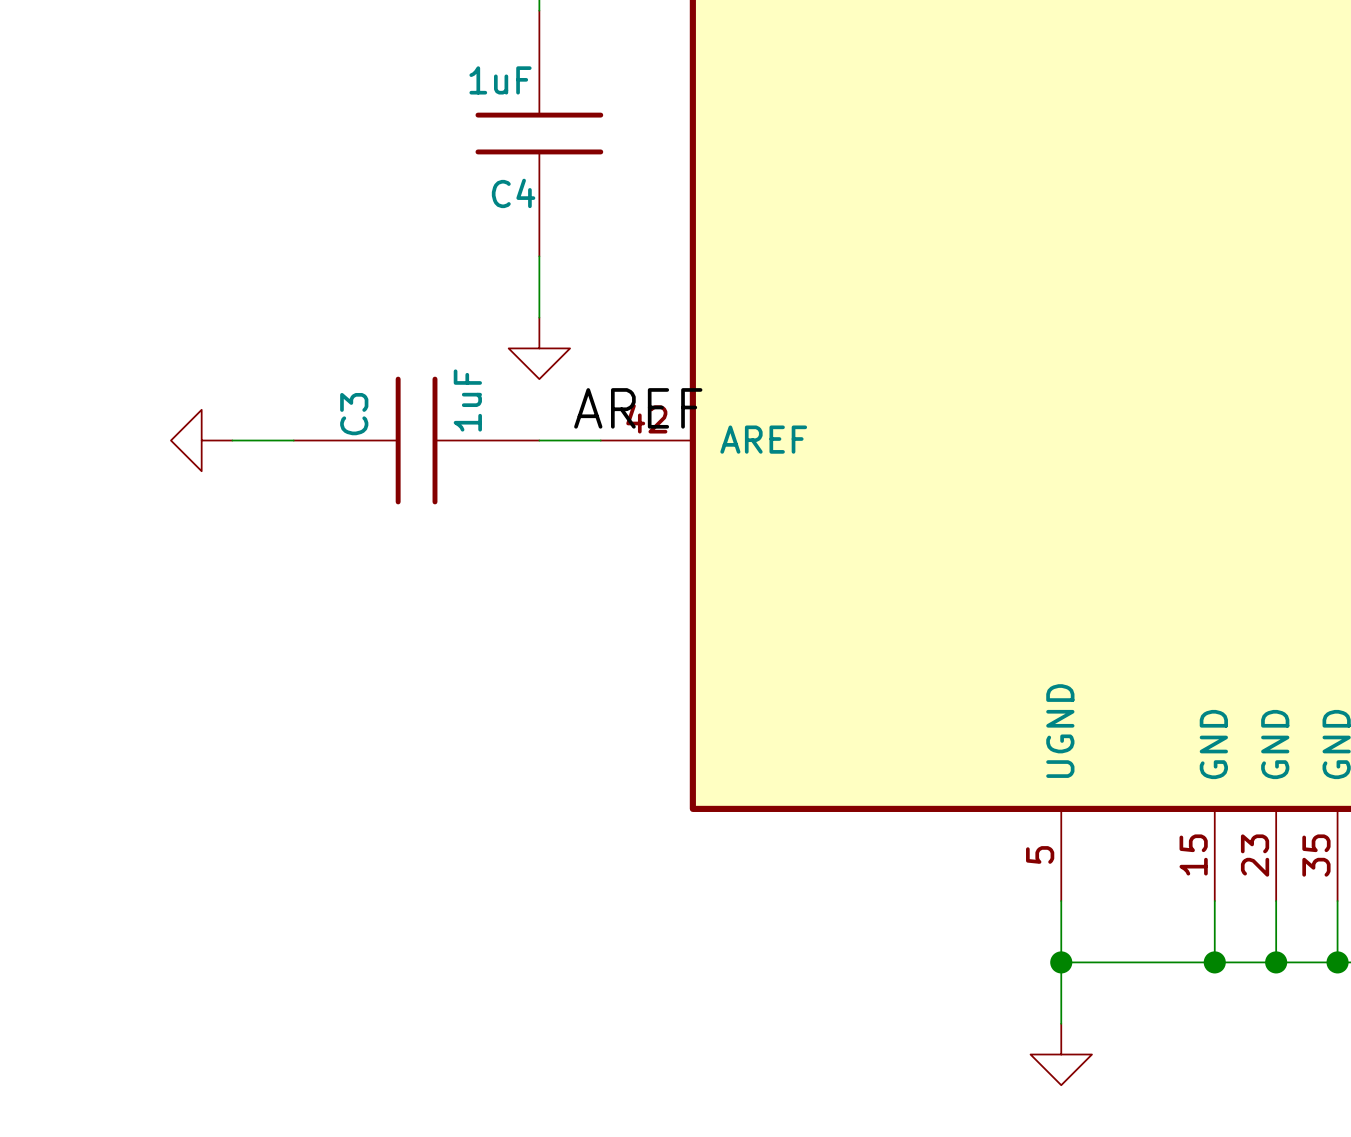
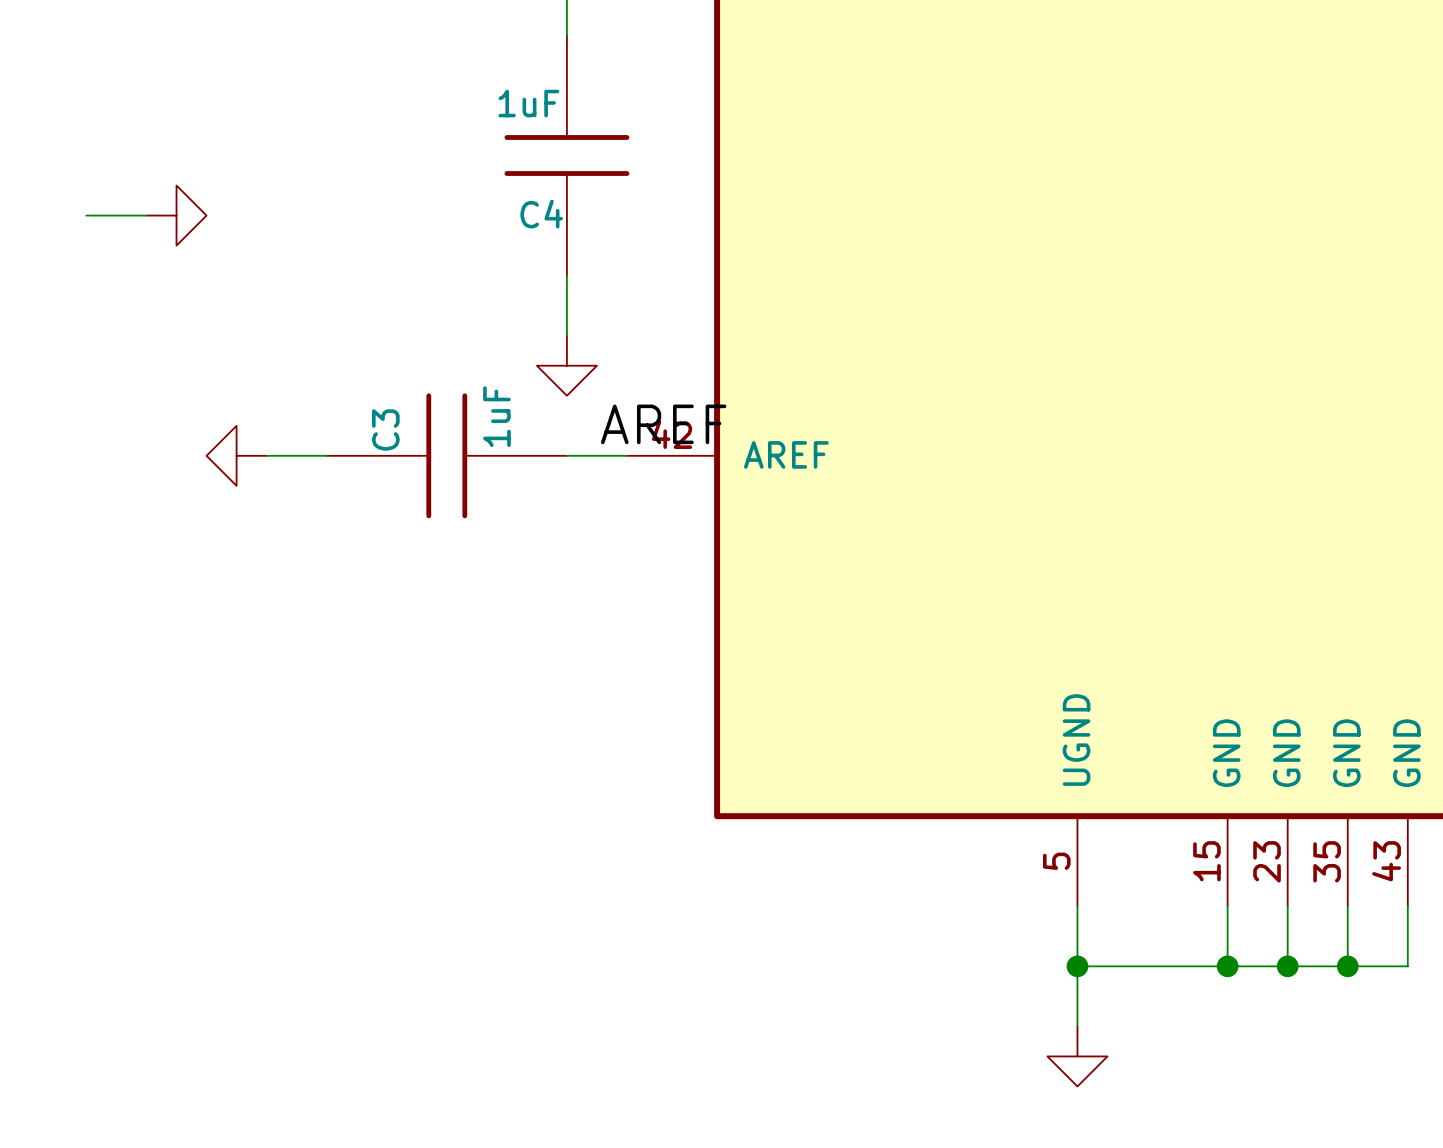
wire: none -> (86, 215) (146, 215)
power symbol: none -> (176, 215)

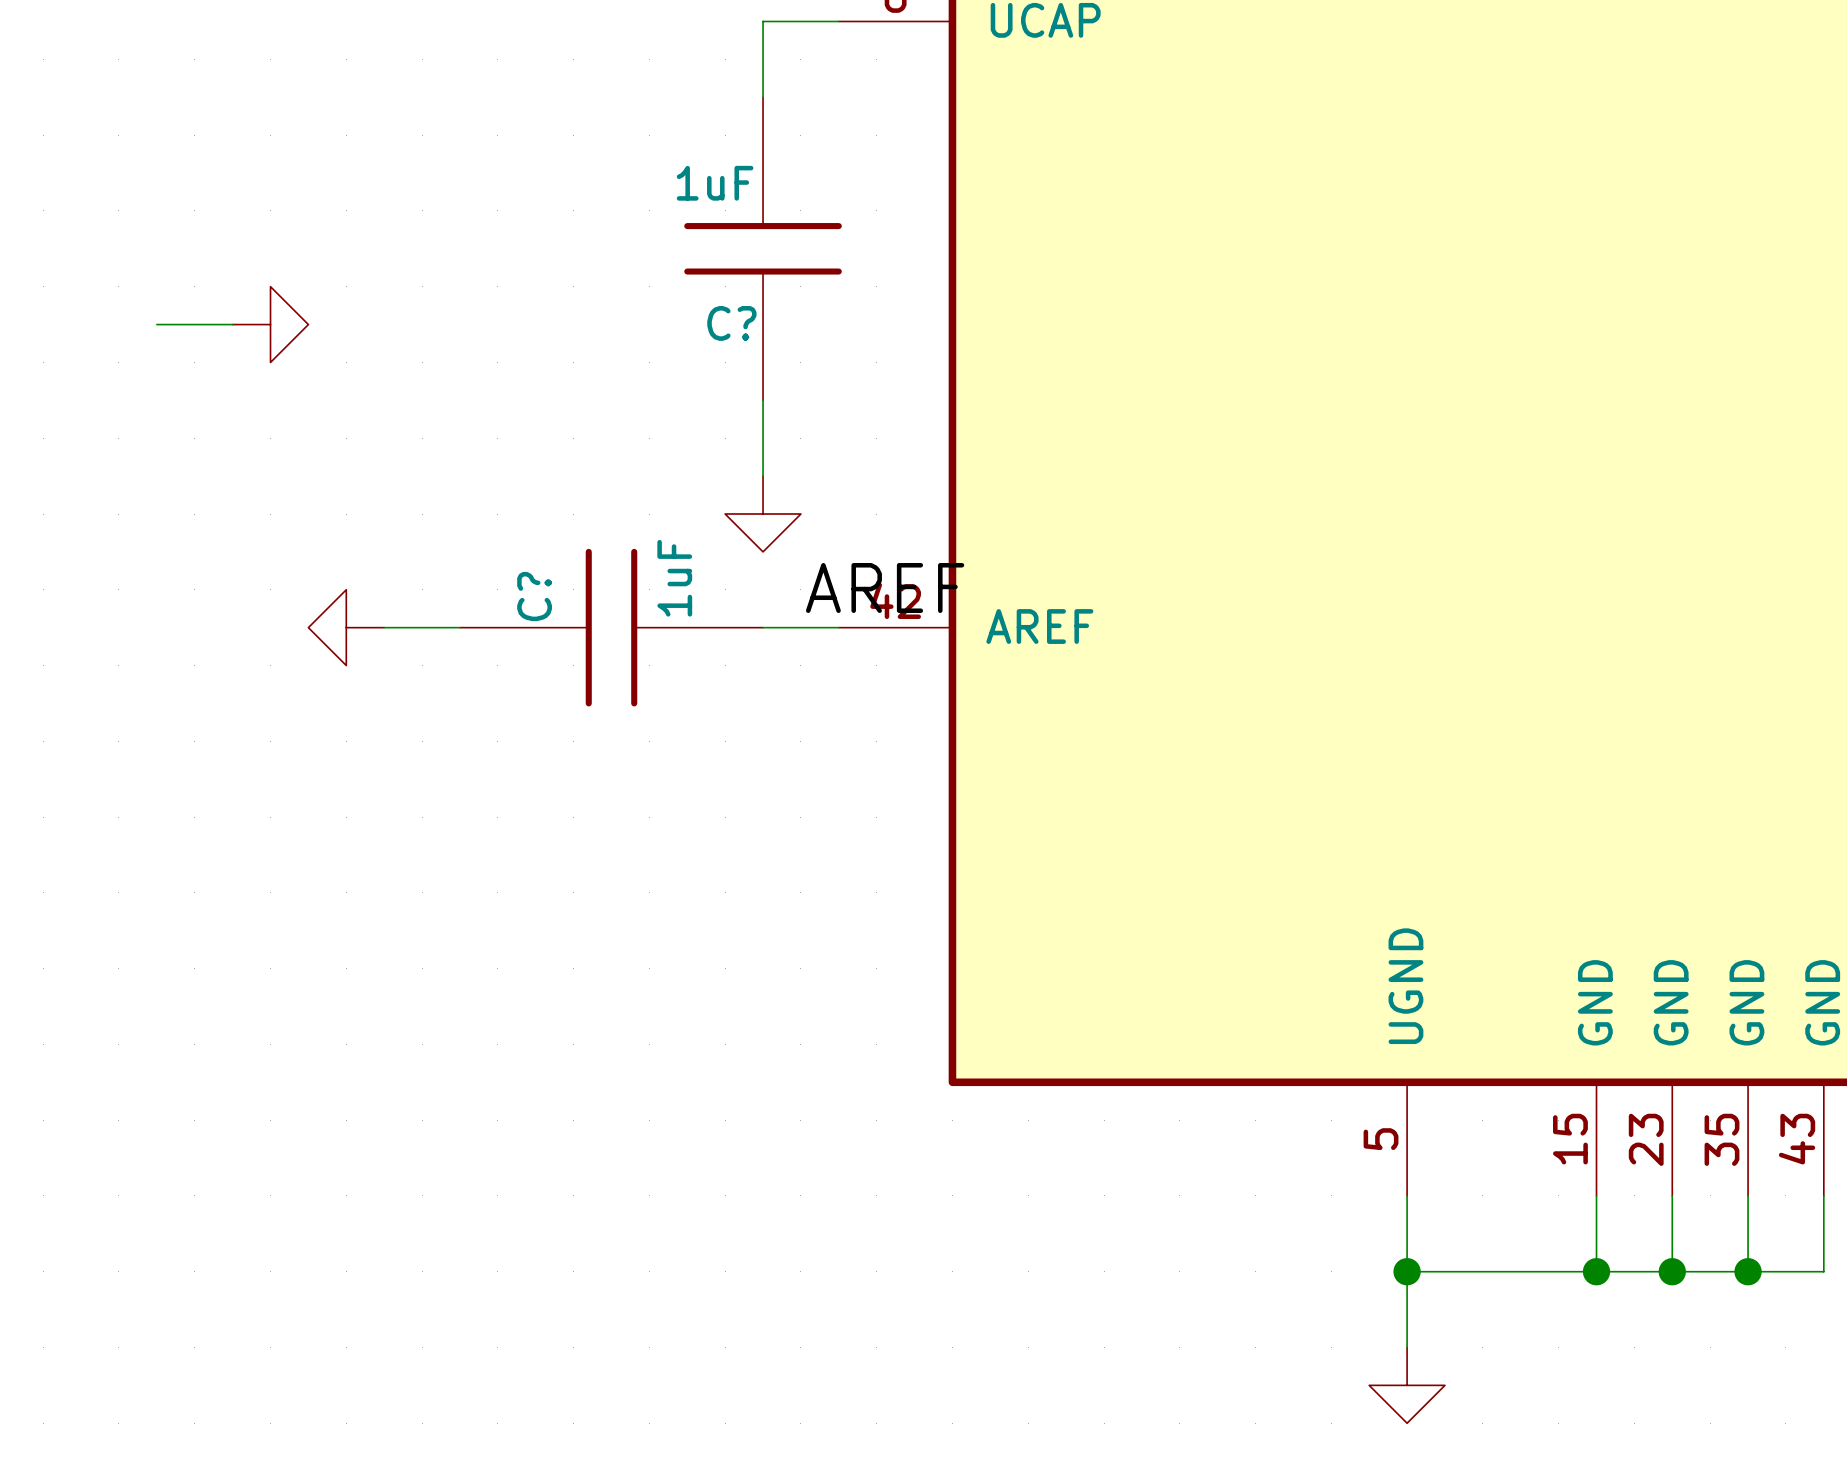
C4 name: C4 (541, 214) -> C? (731, 323)
C3 name: C3 (385, 429) -> C? (534, 596)

